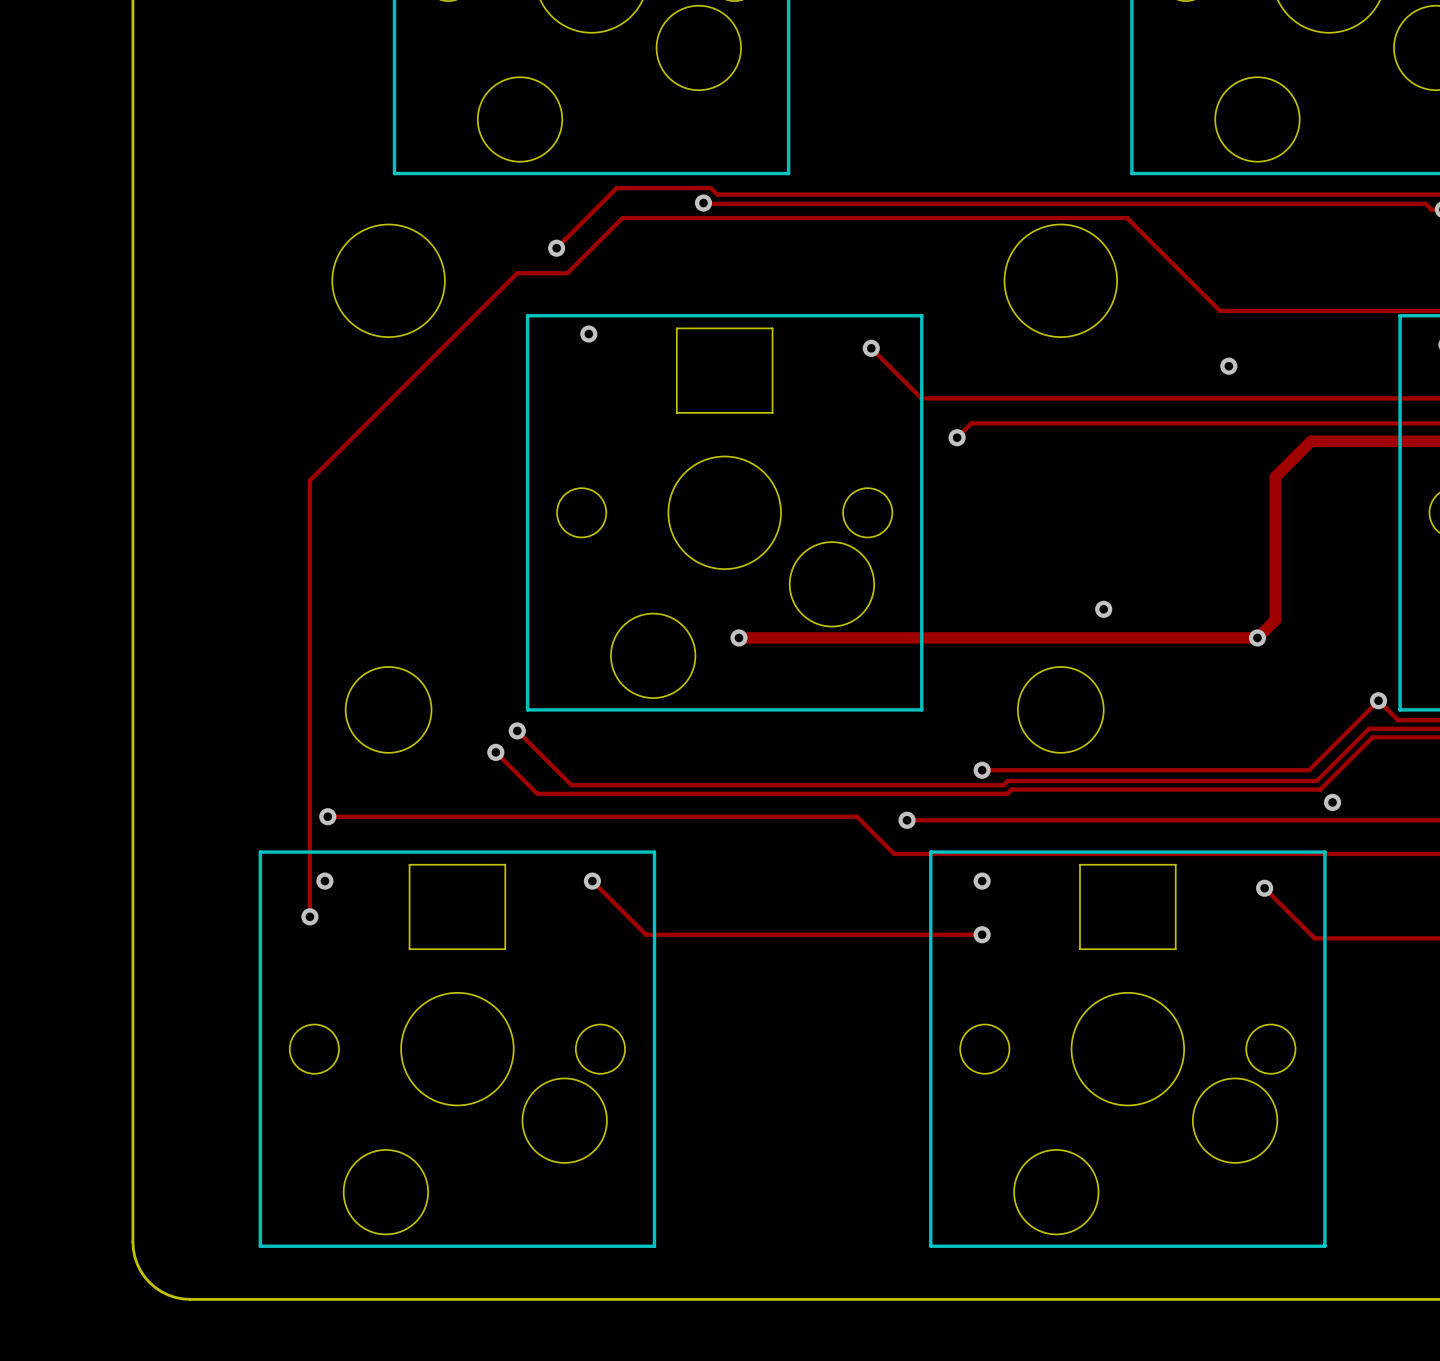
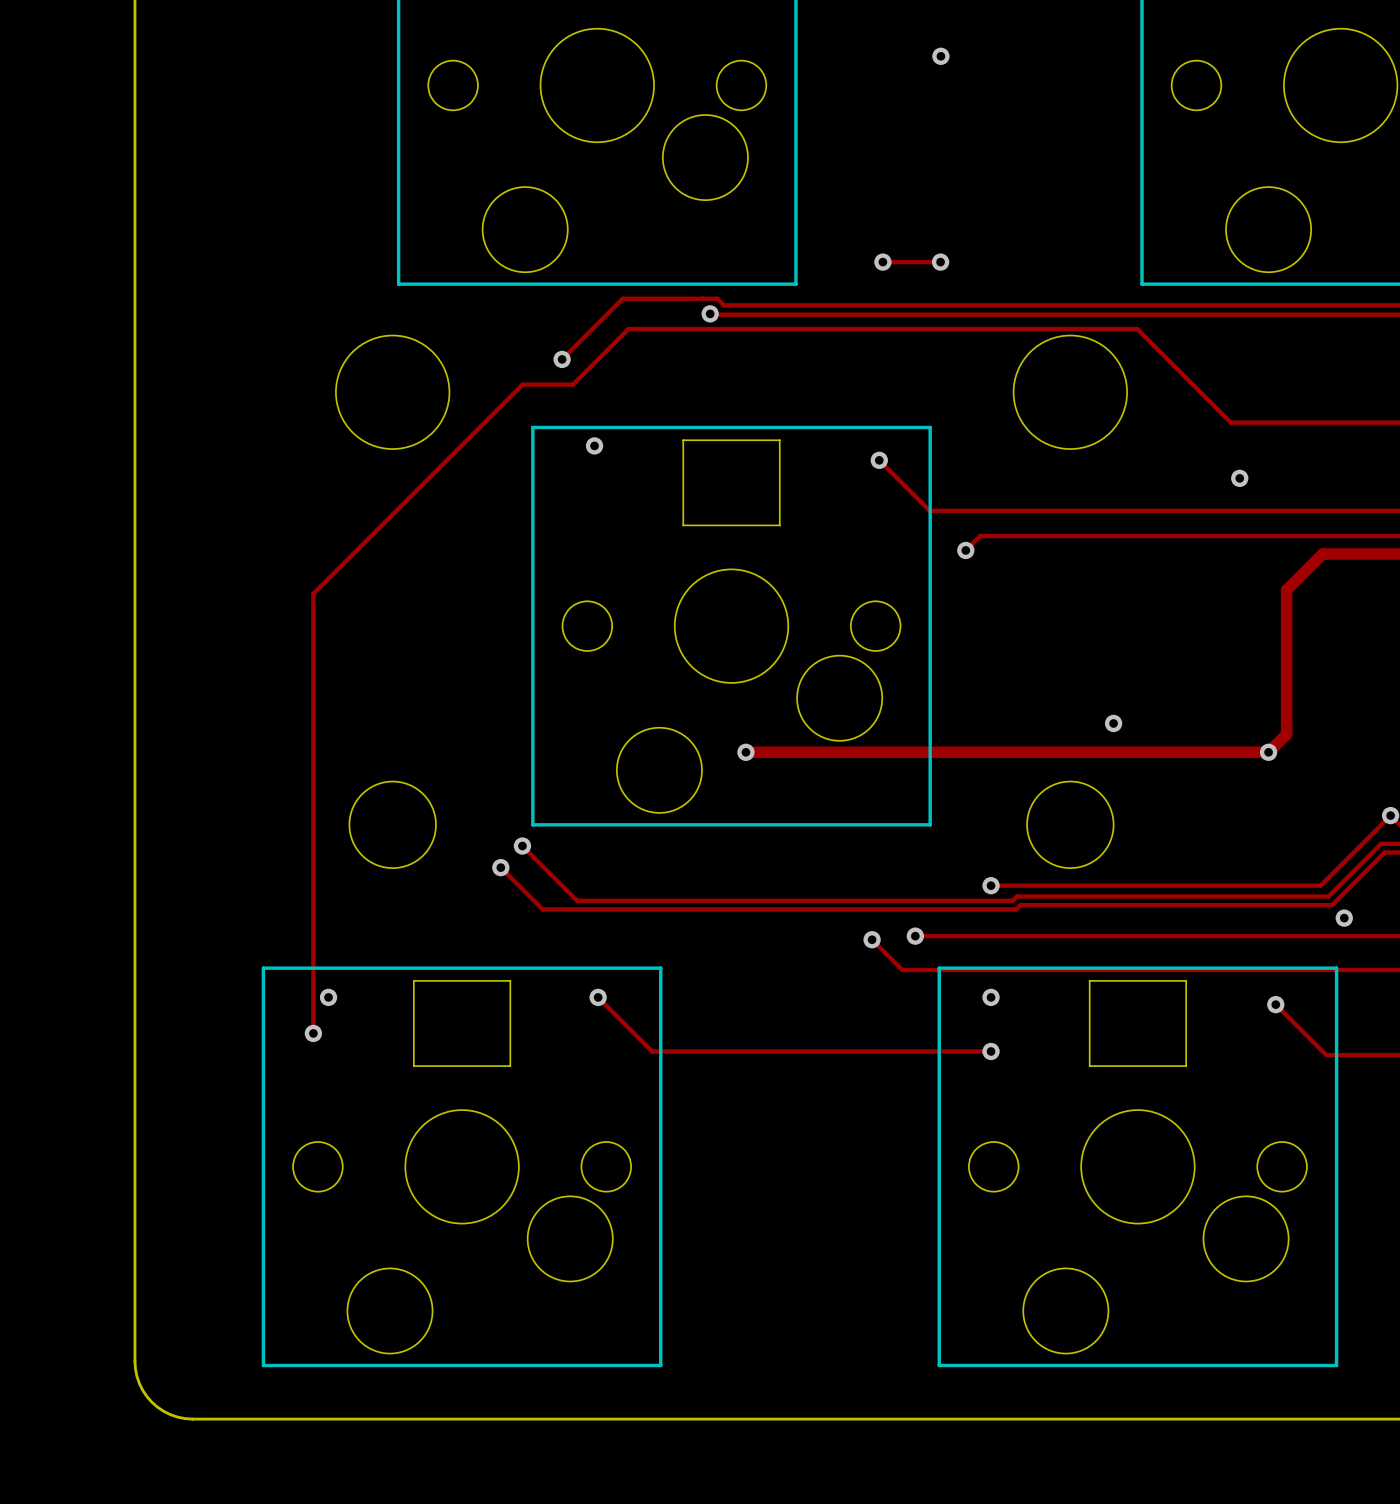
track: none -> (882, 262) (940, 262)
via: none -> (882, 262)
via: none -> (940, 262)
track: (327, 816) (856, 816) (864, 823) -> none
via: (327, 816) -> none
via: none -> (872, 939)

